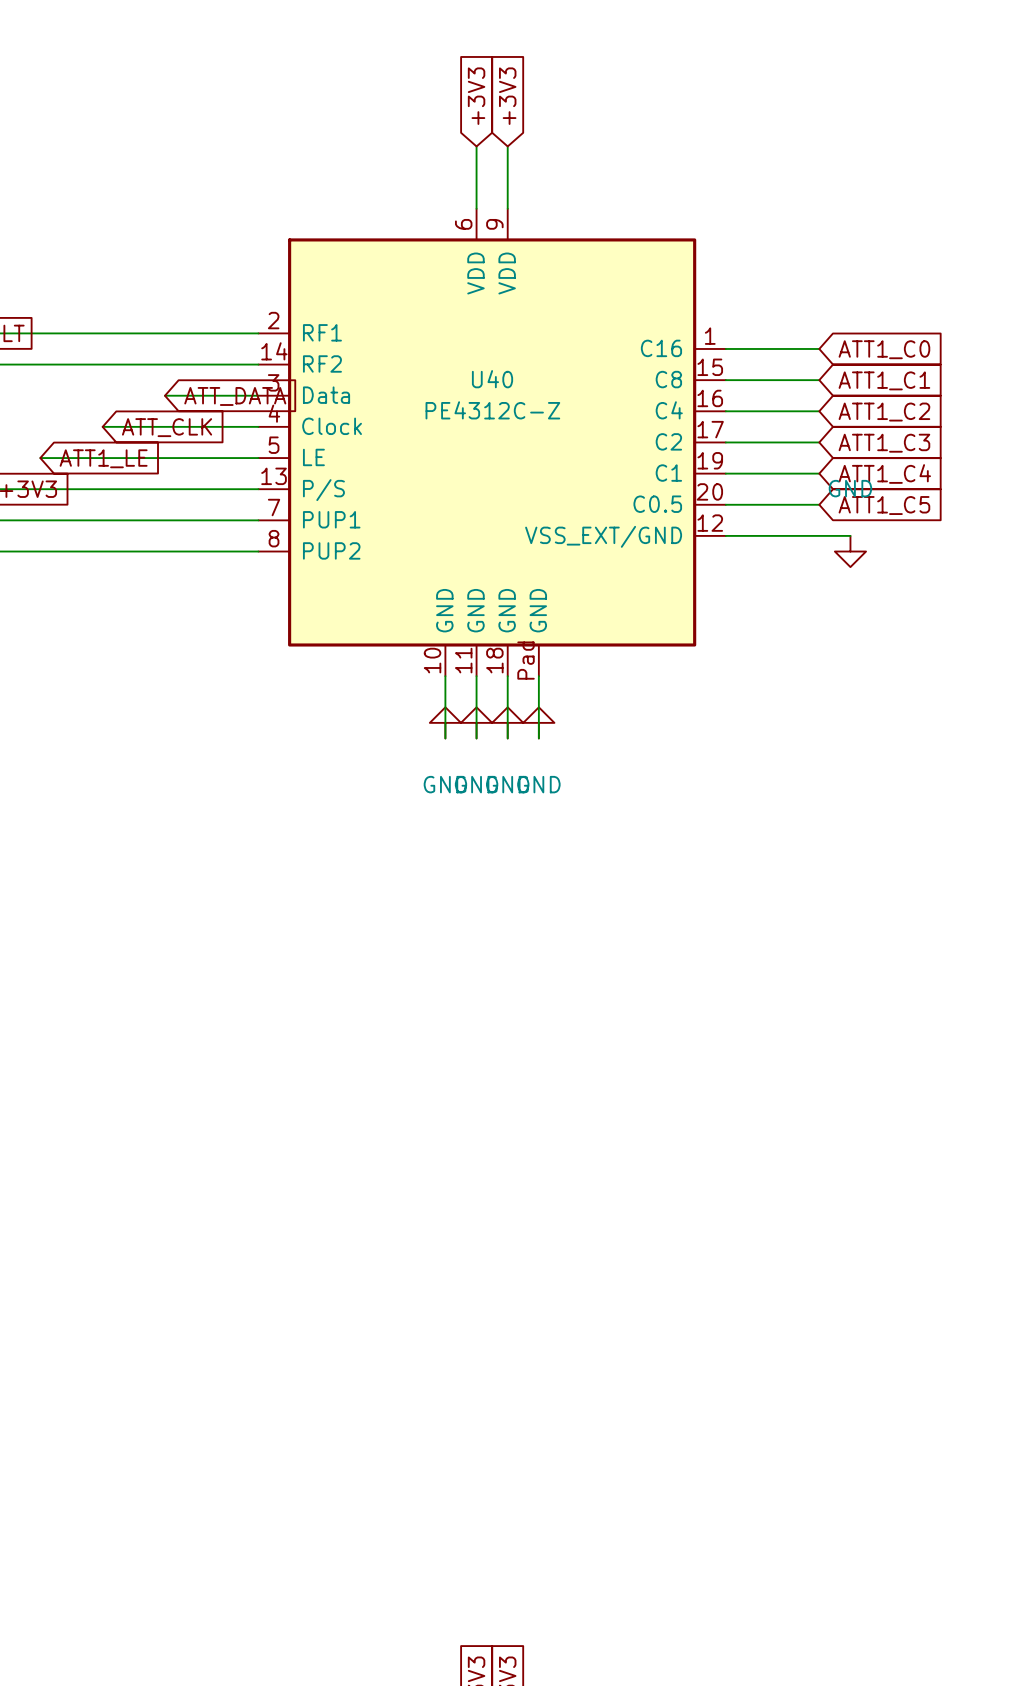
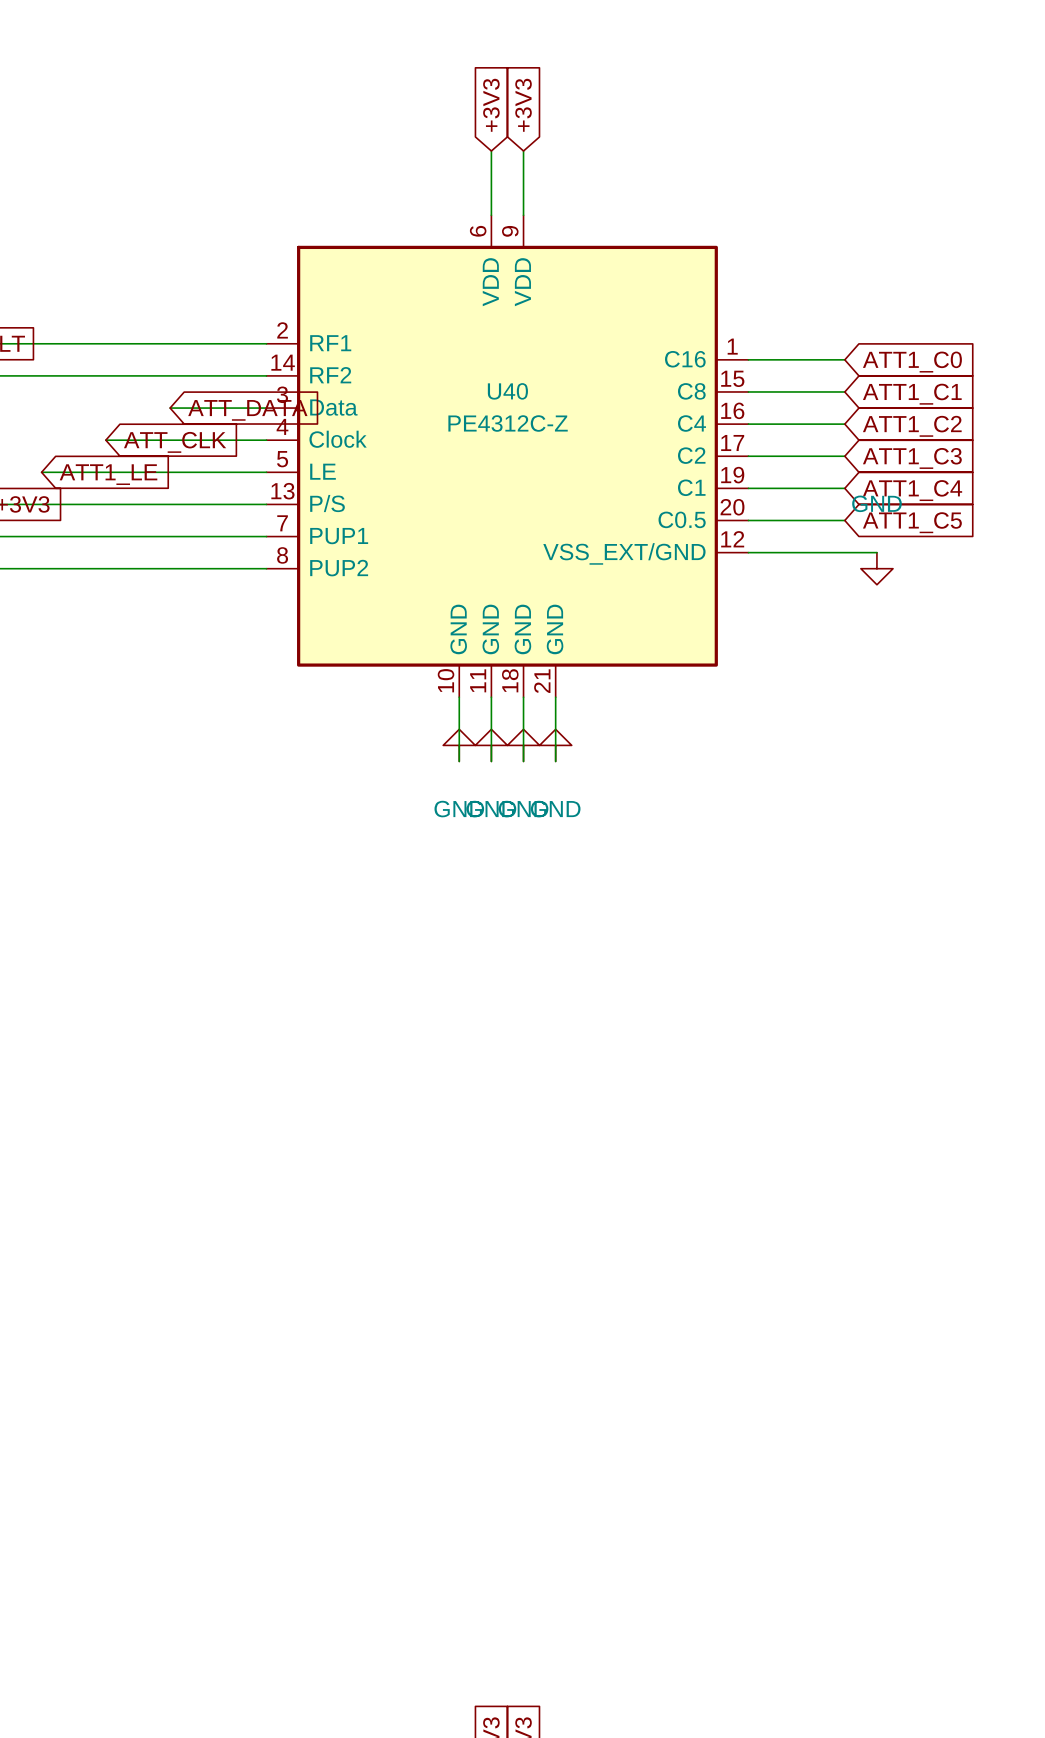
U40 pin number: Pad (526, 660) -> 21 (542, 681)

